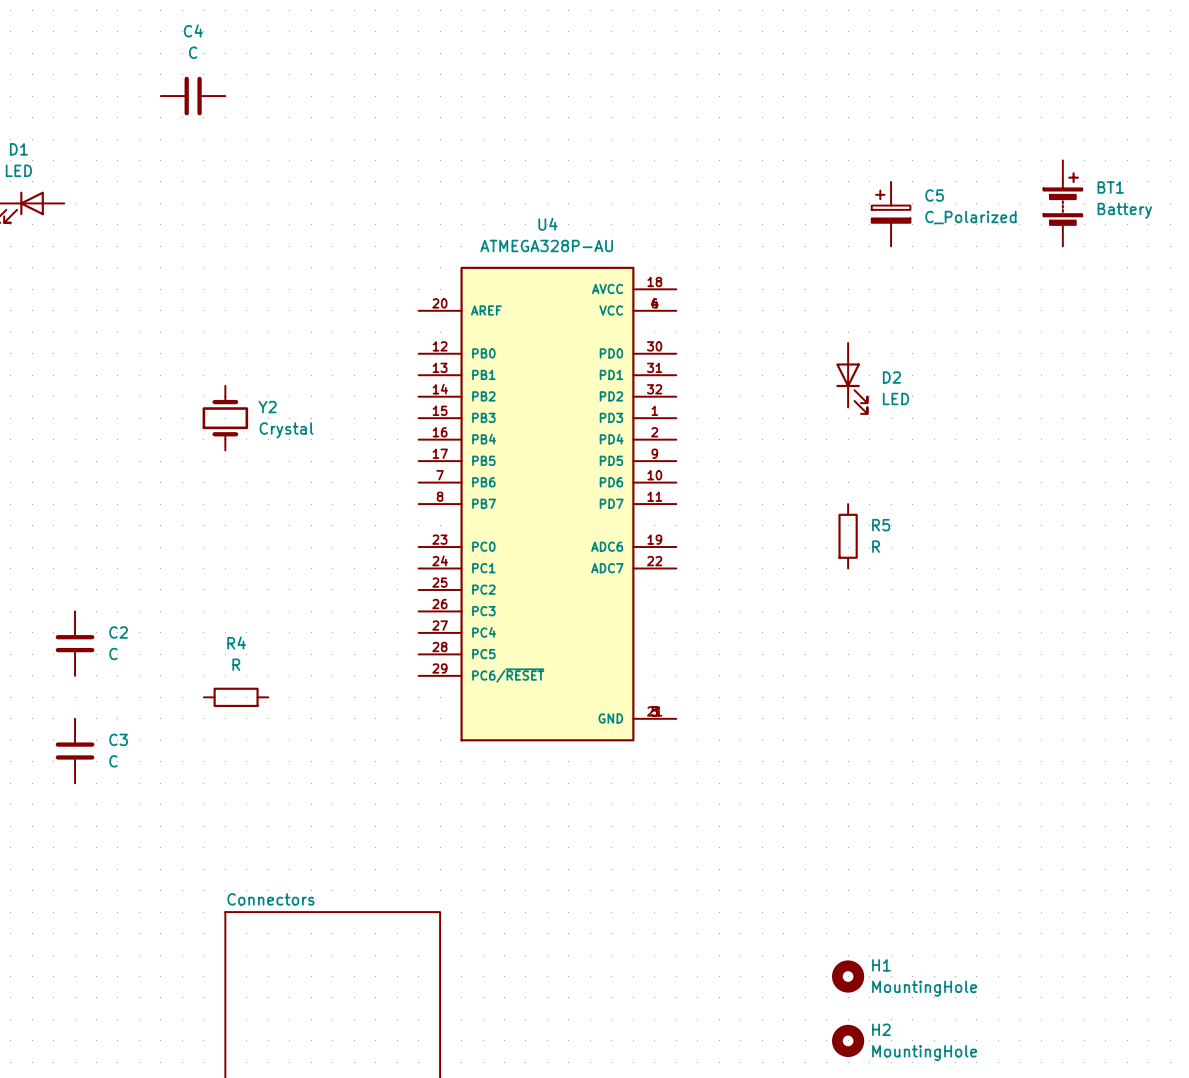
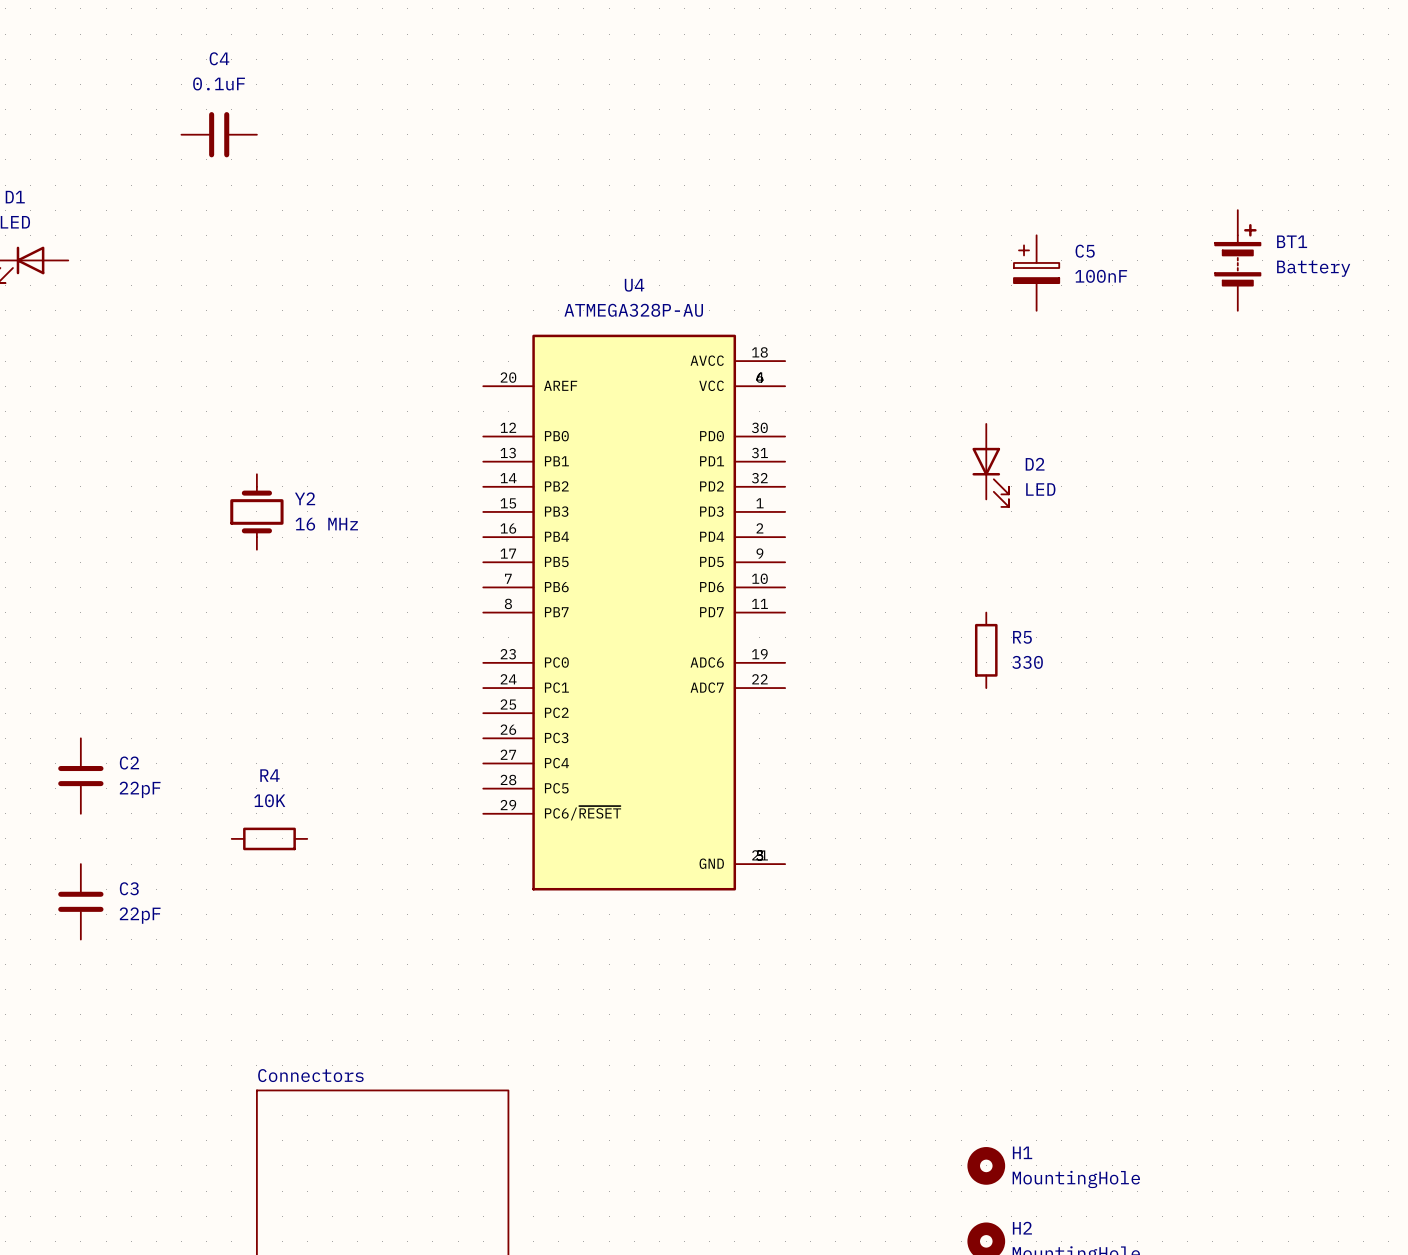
C4 value: C (193, 52) -> 0.1uF (219, 83)
C5 value: C_Polarized (970, 217) -> 100nF (1101, 276)
Y2 value: Crystal (286, 430) -> 16 MHz (326, 524)
R5 value: R (876, 546) -> 330 (1027, 662)
C2 value: C (113, 653) -> 22pF (140, 789)
R4 value: R (236, 664) -> 10K (269, 800)
C3 value: C (113, 761) -> 22pF (140, 915)

